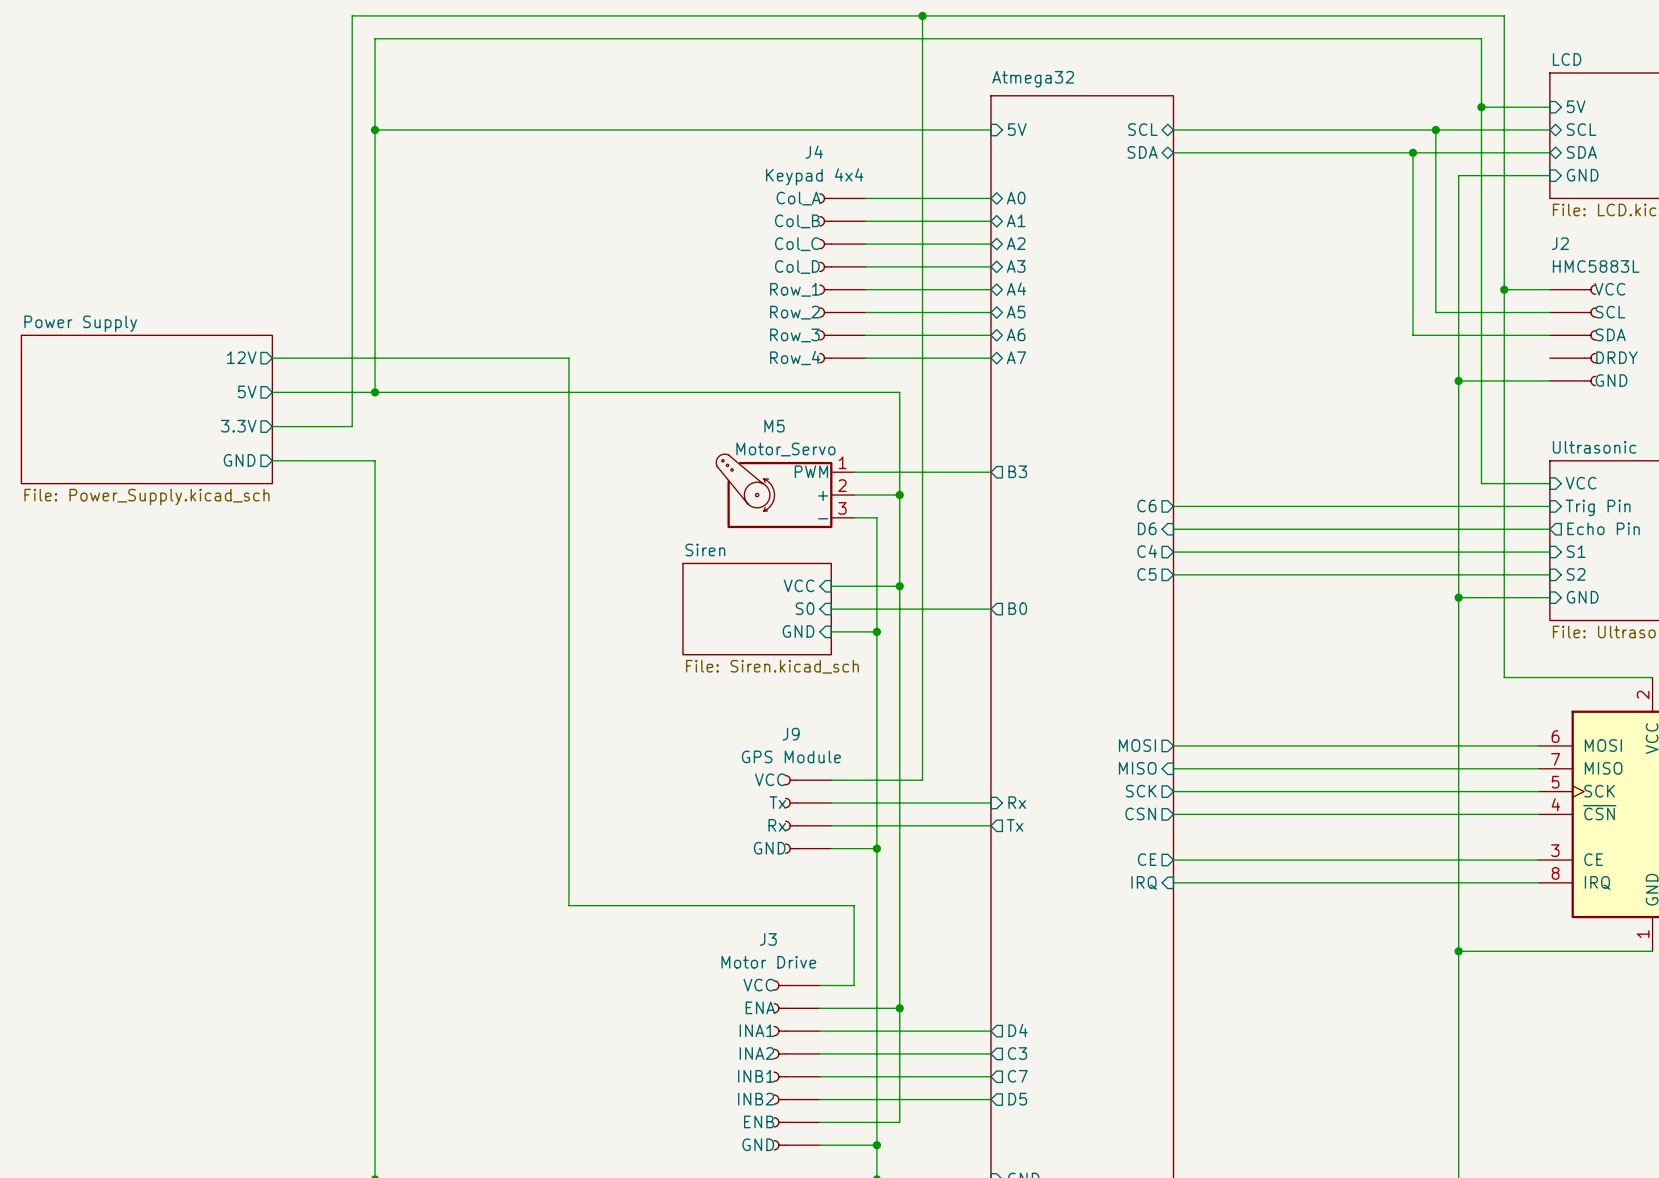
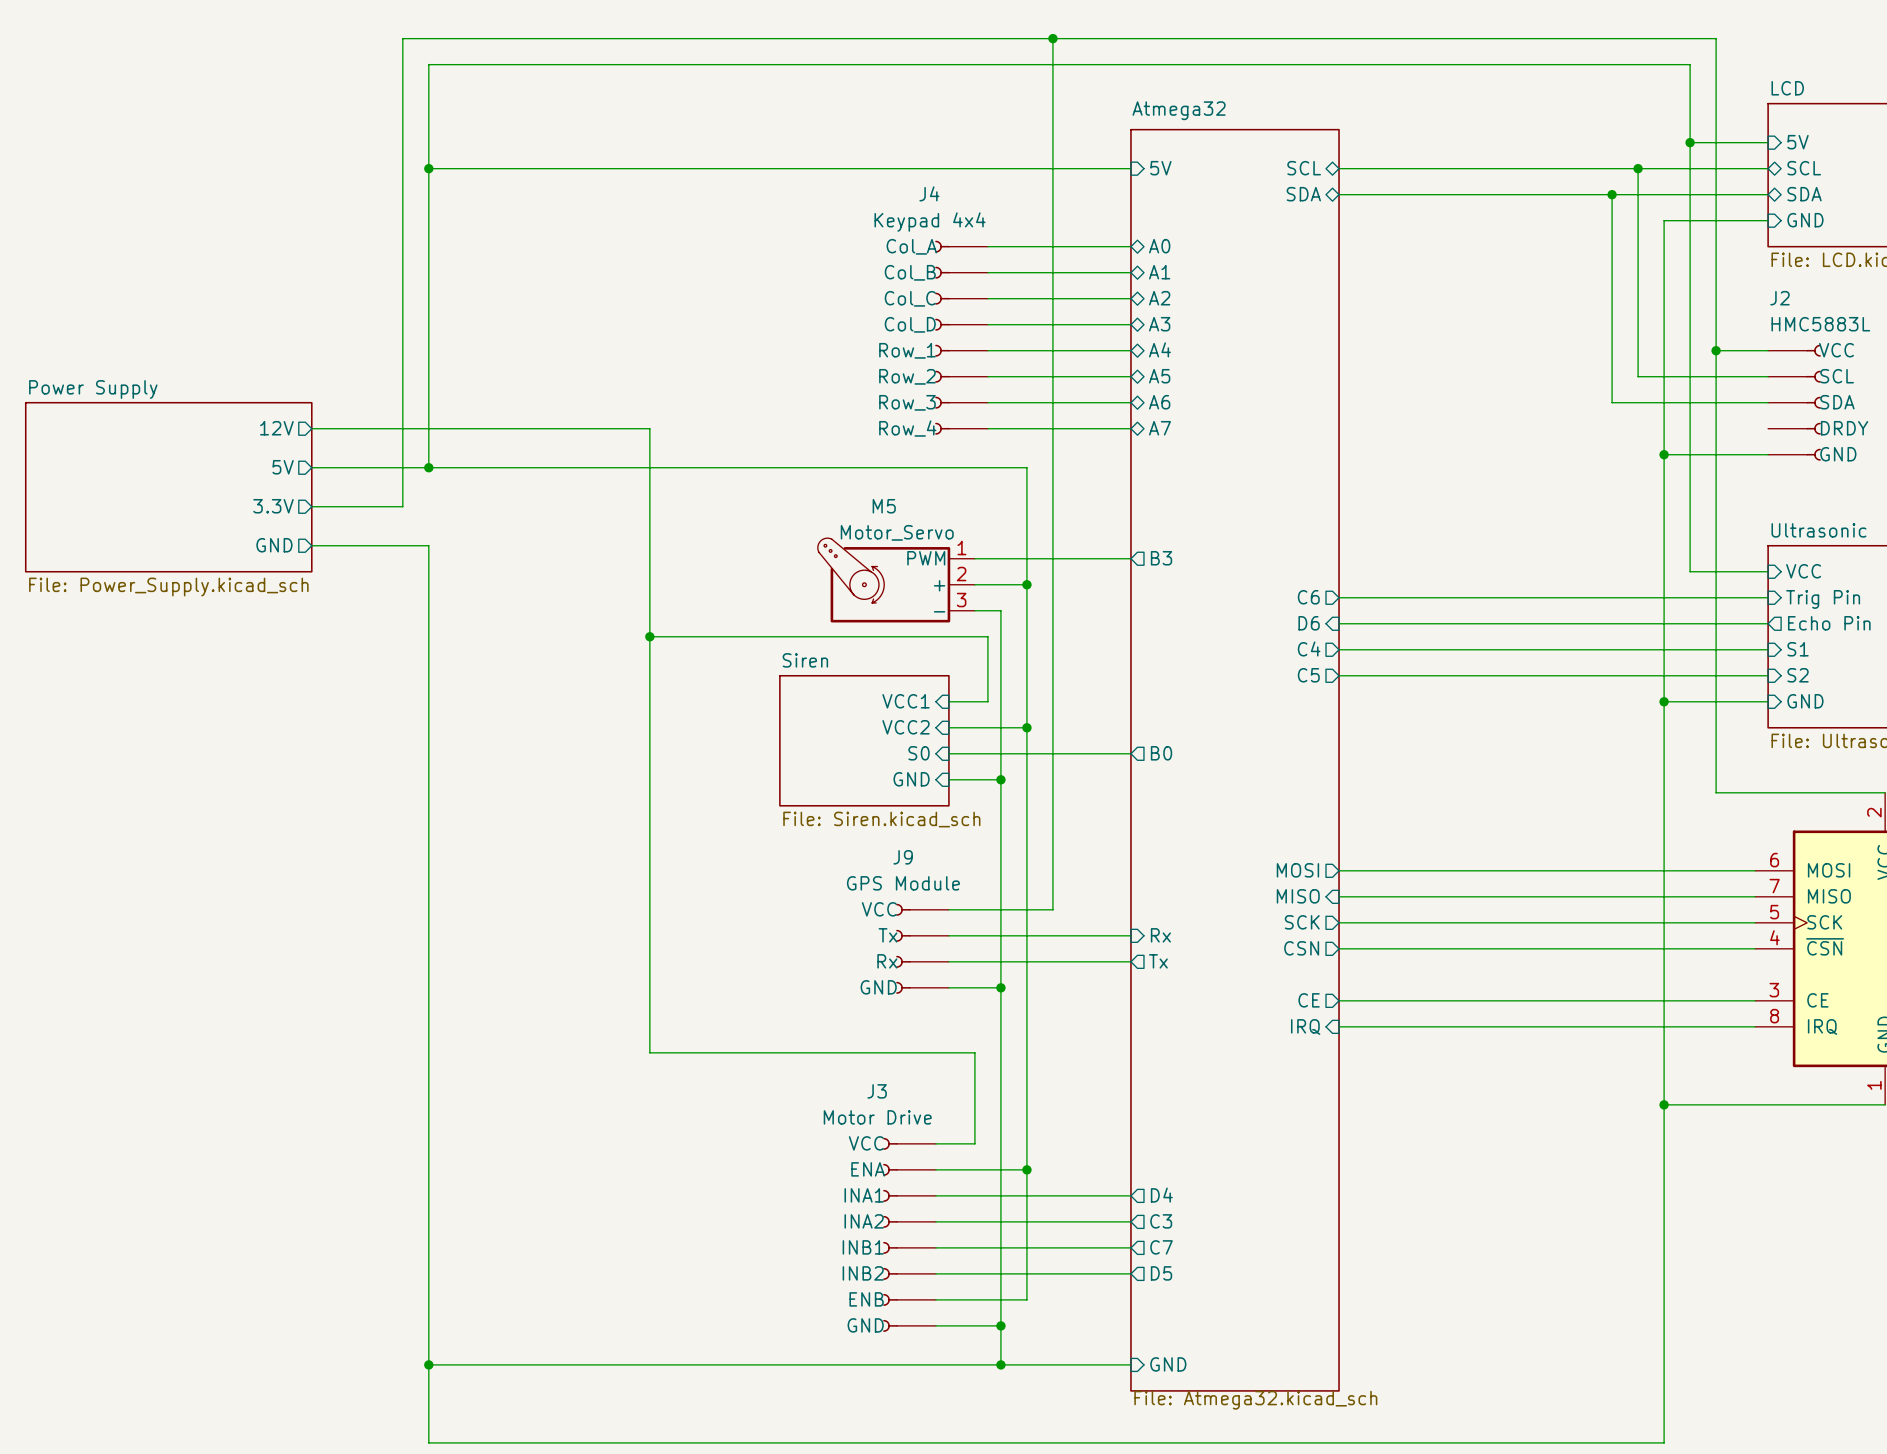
wire: none -> (649, 636) (987, 636) (987, 701) (948, 701)
junction: none -> (649, 636)
sheet pin: VCC (799, 585) -> VCC1 (906, 701)
wire: (831, 586) (899, 586) -> (948, 727) (1026, 727)
junction: (899, 586) -> none
sheet pin position: S0 (805, 608) -> S0 (919, 753)
sheet pin position: B0 (1017, 608) -> B0 (1161, 753)
sheet Siren: File: Siren.kicad_sch (757, 609) -> none
wire: (831, 609) (990, 609) -> (948, 753) (1130, 753)
sheet pin: none -> VCC2 (906, 727)
junction: none -> (1026, 727)
sheet Siren: none -> File: Siren.kicad_sch (864, 740)
sheet pin position: GND (798, 631) -> GND (911, 779)
wire: (831, 631) (876, 631) -> (948, 779) (1000, 779)
junction: (876, 631) -> none
junction: none -> (1000, 779)

